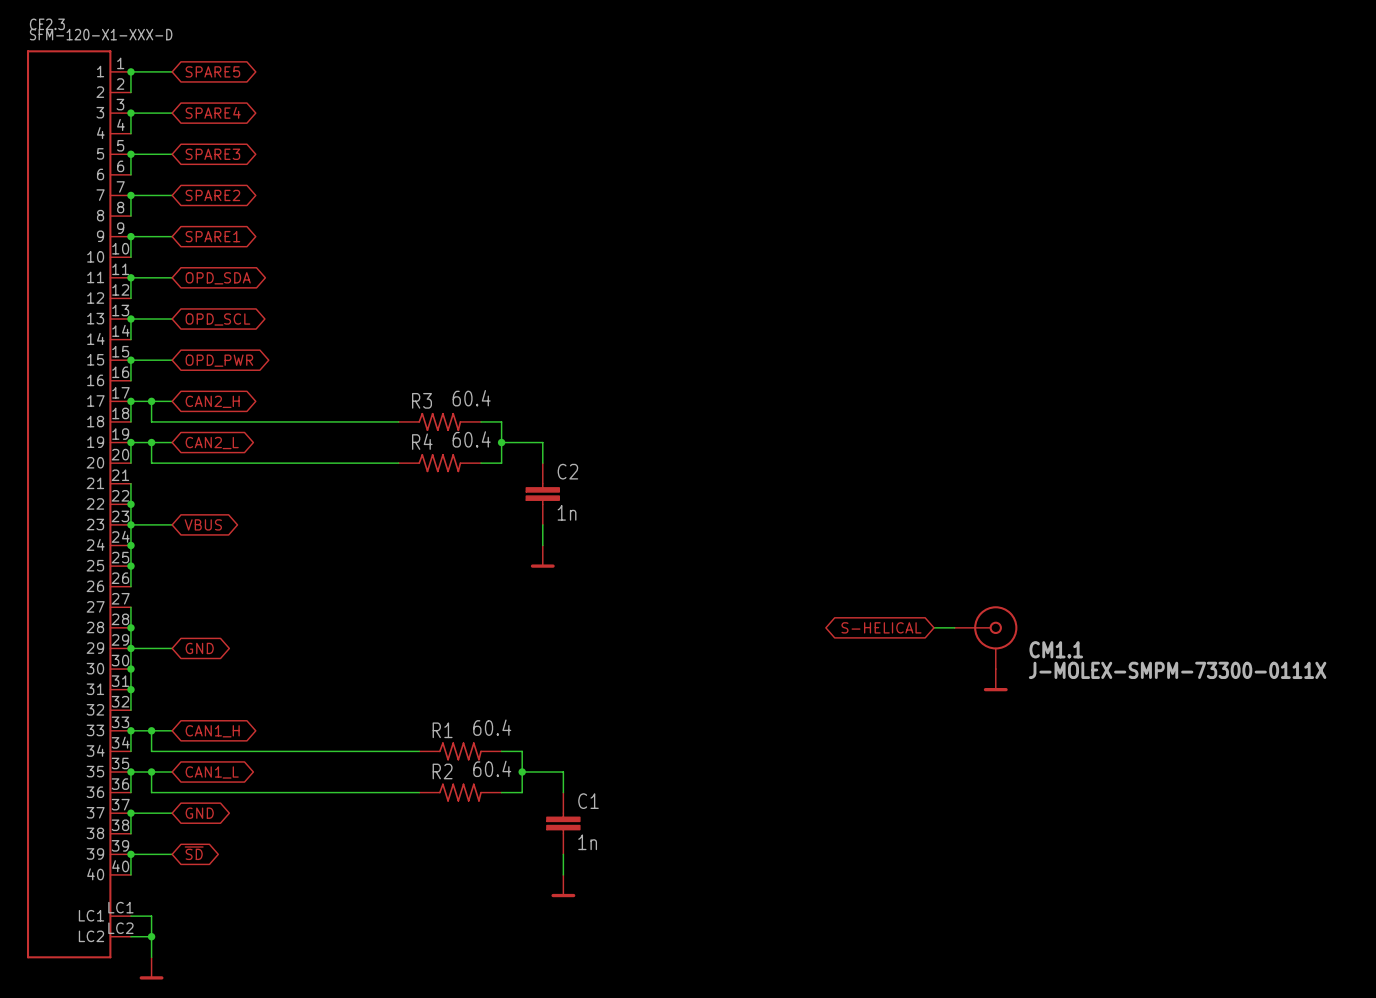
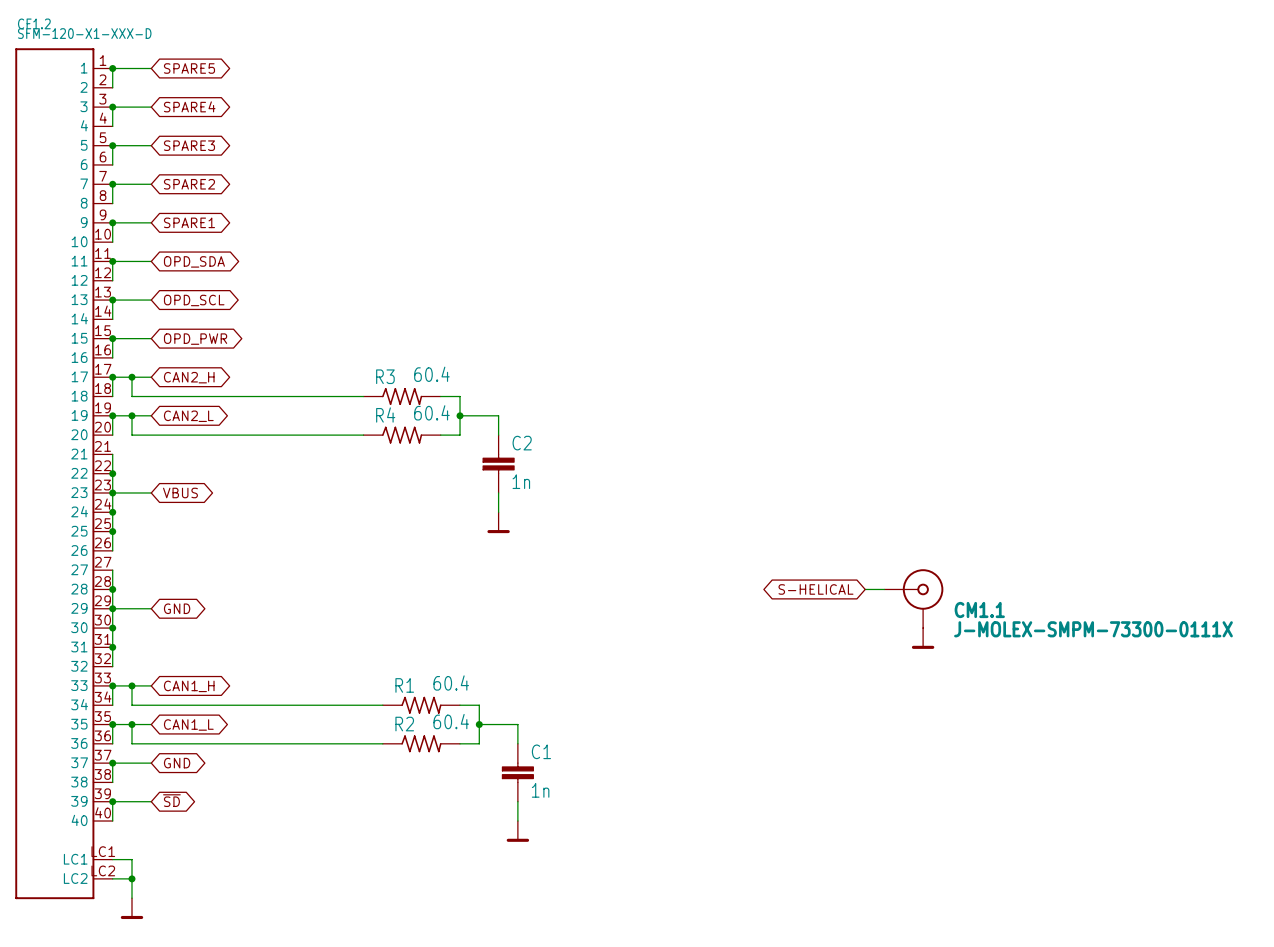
CF2.3 name: CF2.3 (47, 24) -> CF1.2 (34, 23)

